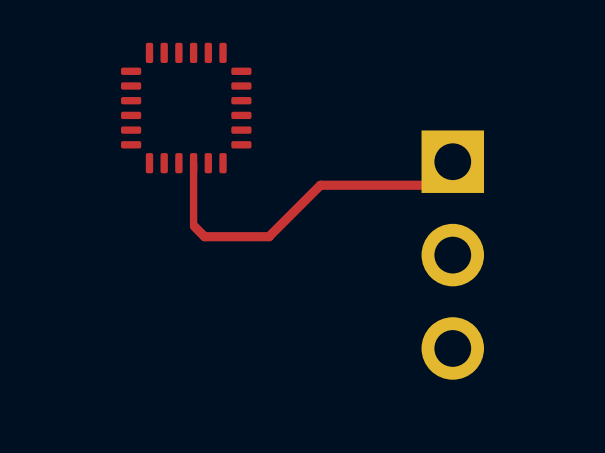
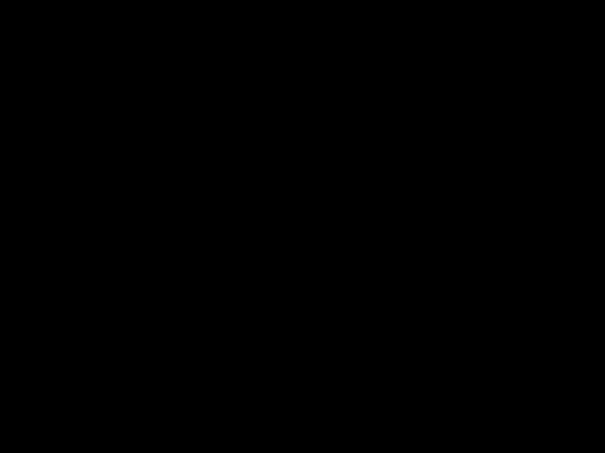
part: (186, 108) -> none
top track: (452, 161) (429, 185) (320, 185) (268, 236) (204, 236) (193, 225) (193, 163) -> none
part: (452, 255) -> none

